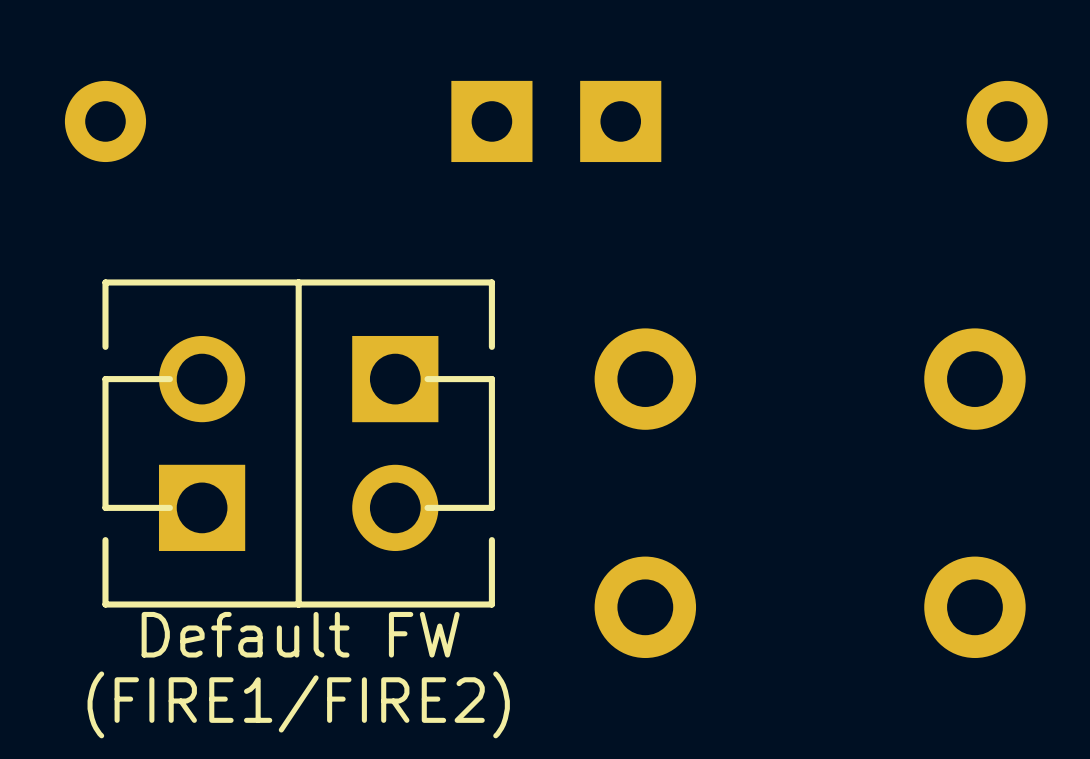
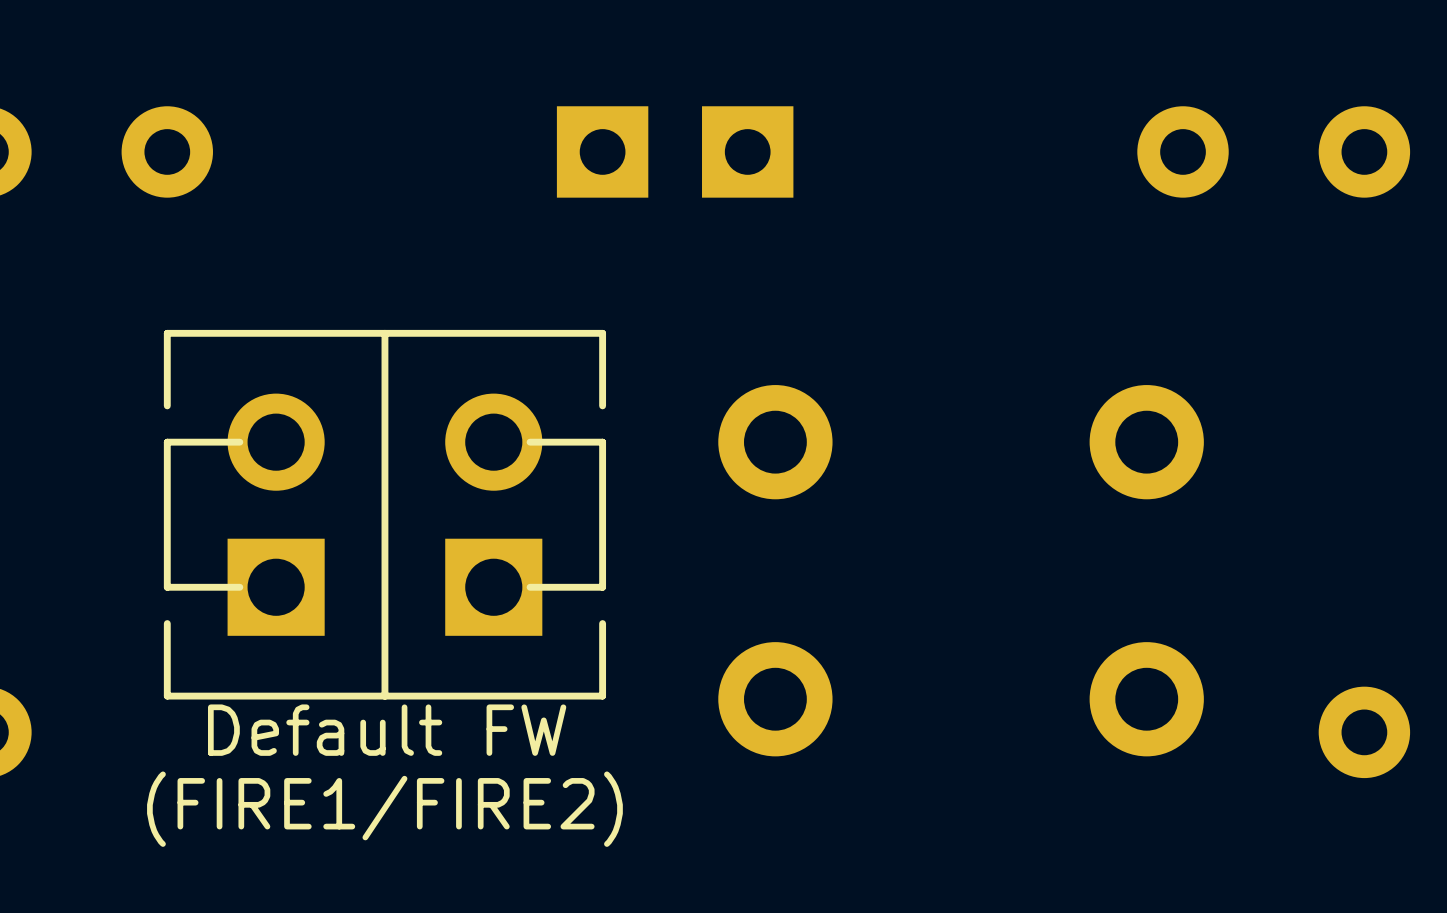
part rotation: 0° (395, 443) -> 180° (493, 514)

